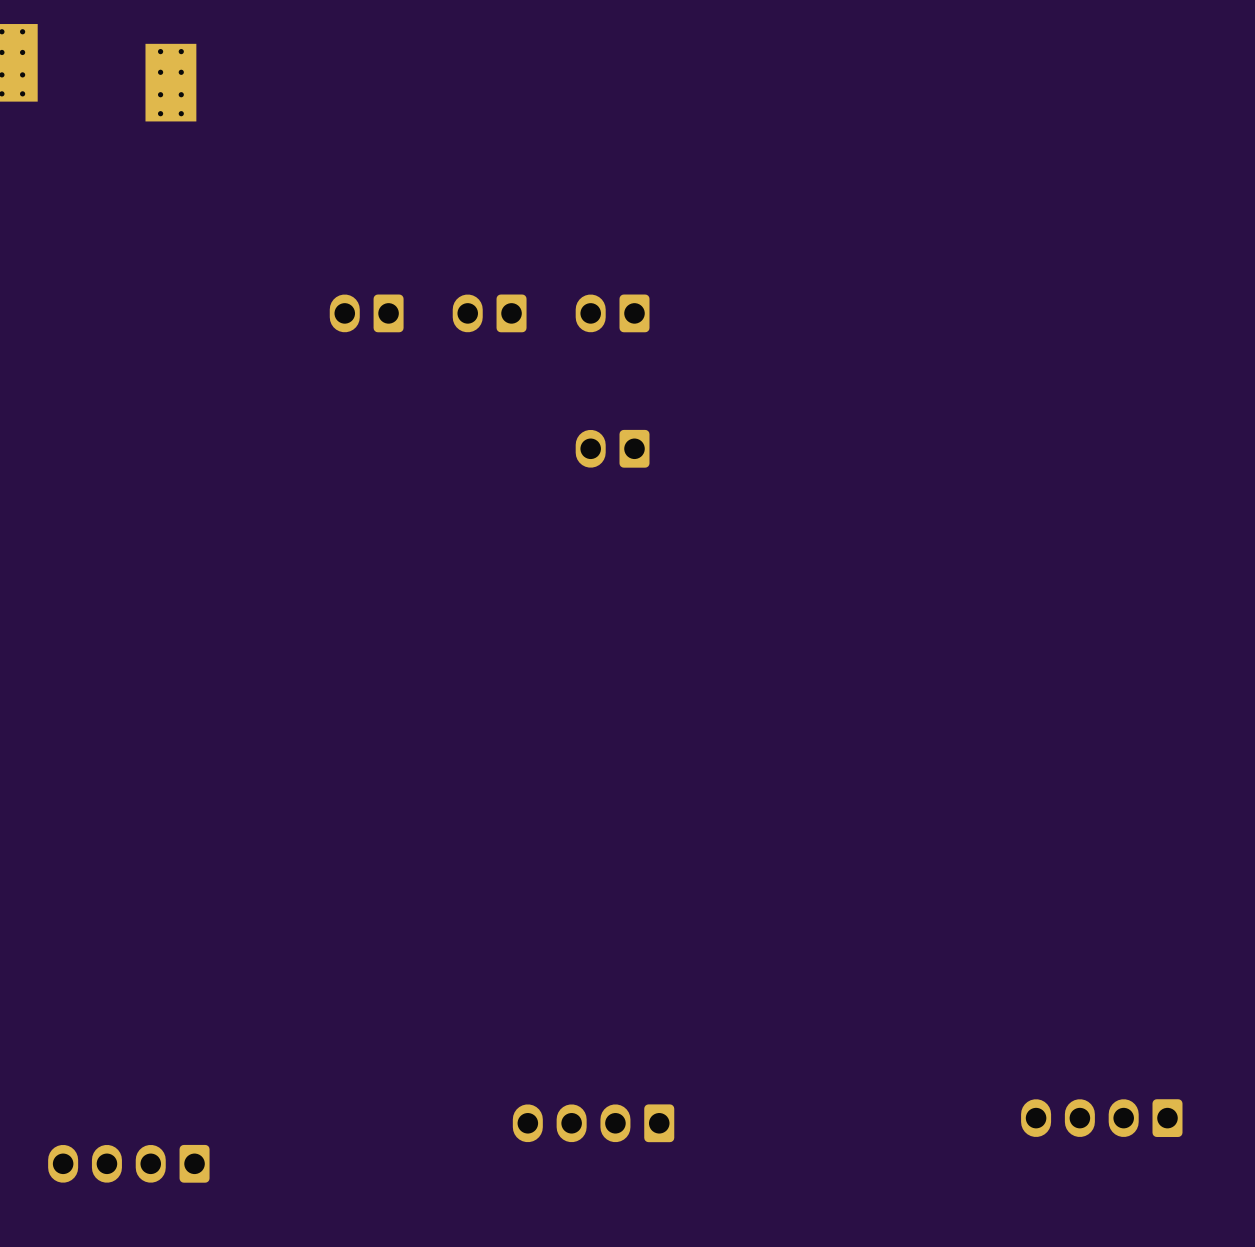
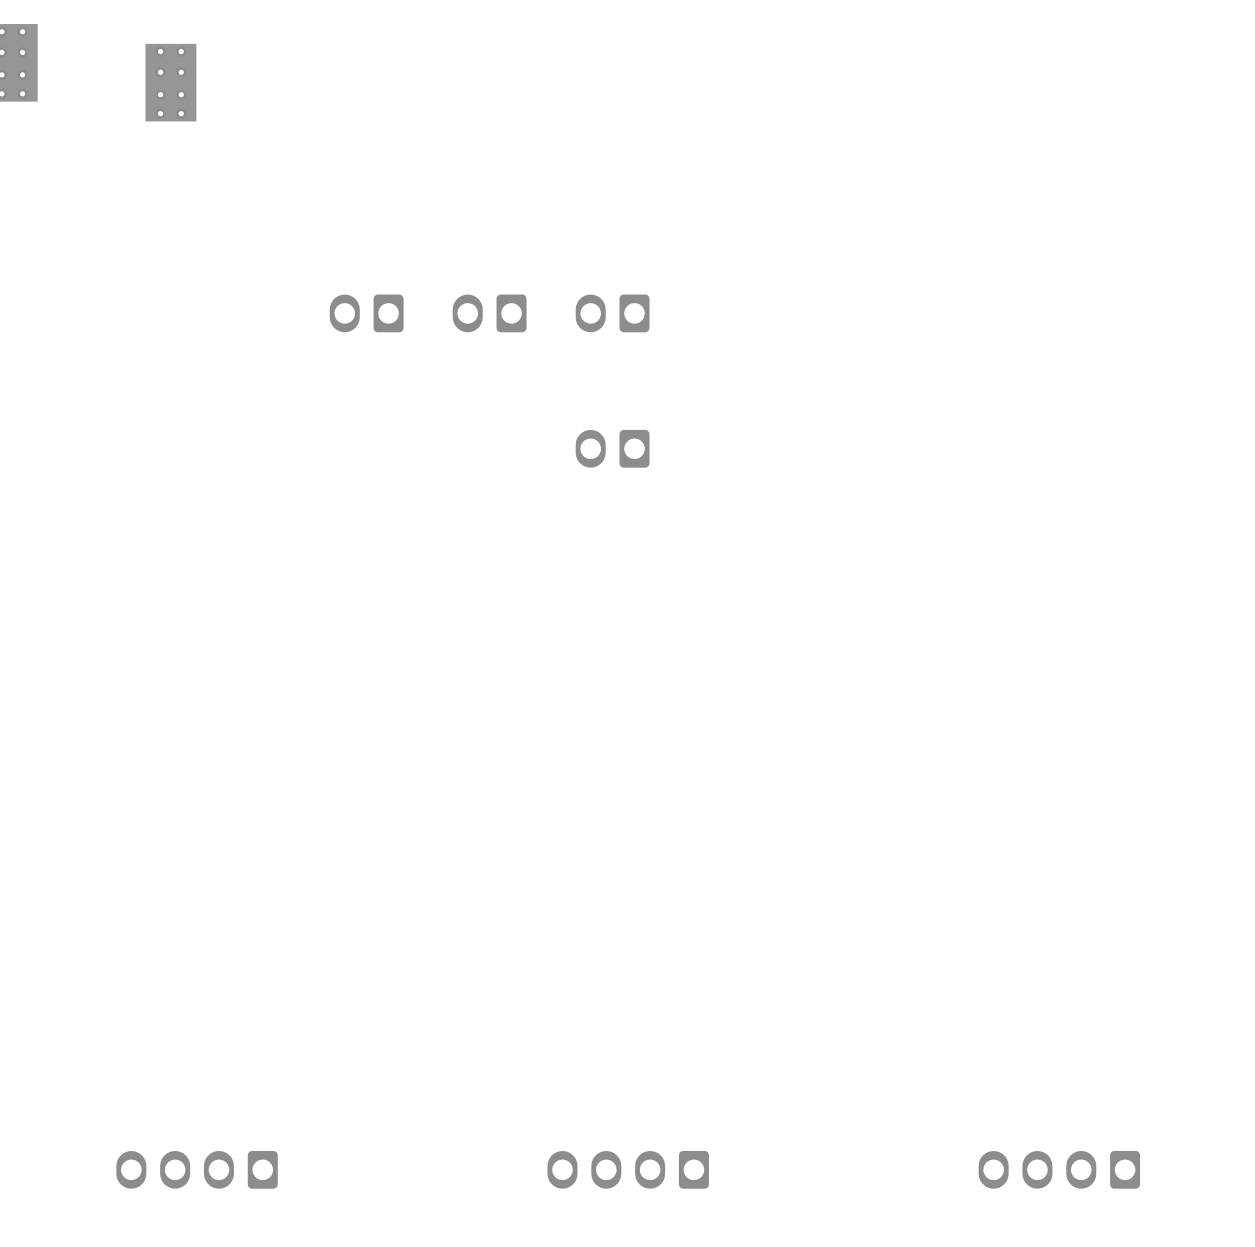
part position: (1101, 1118) -> (1059, 1169)
part position: (593, 1123) -> (628, 1169)
part position: (128, 1163) -> (197, 1169)

